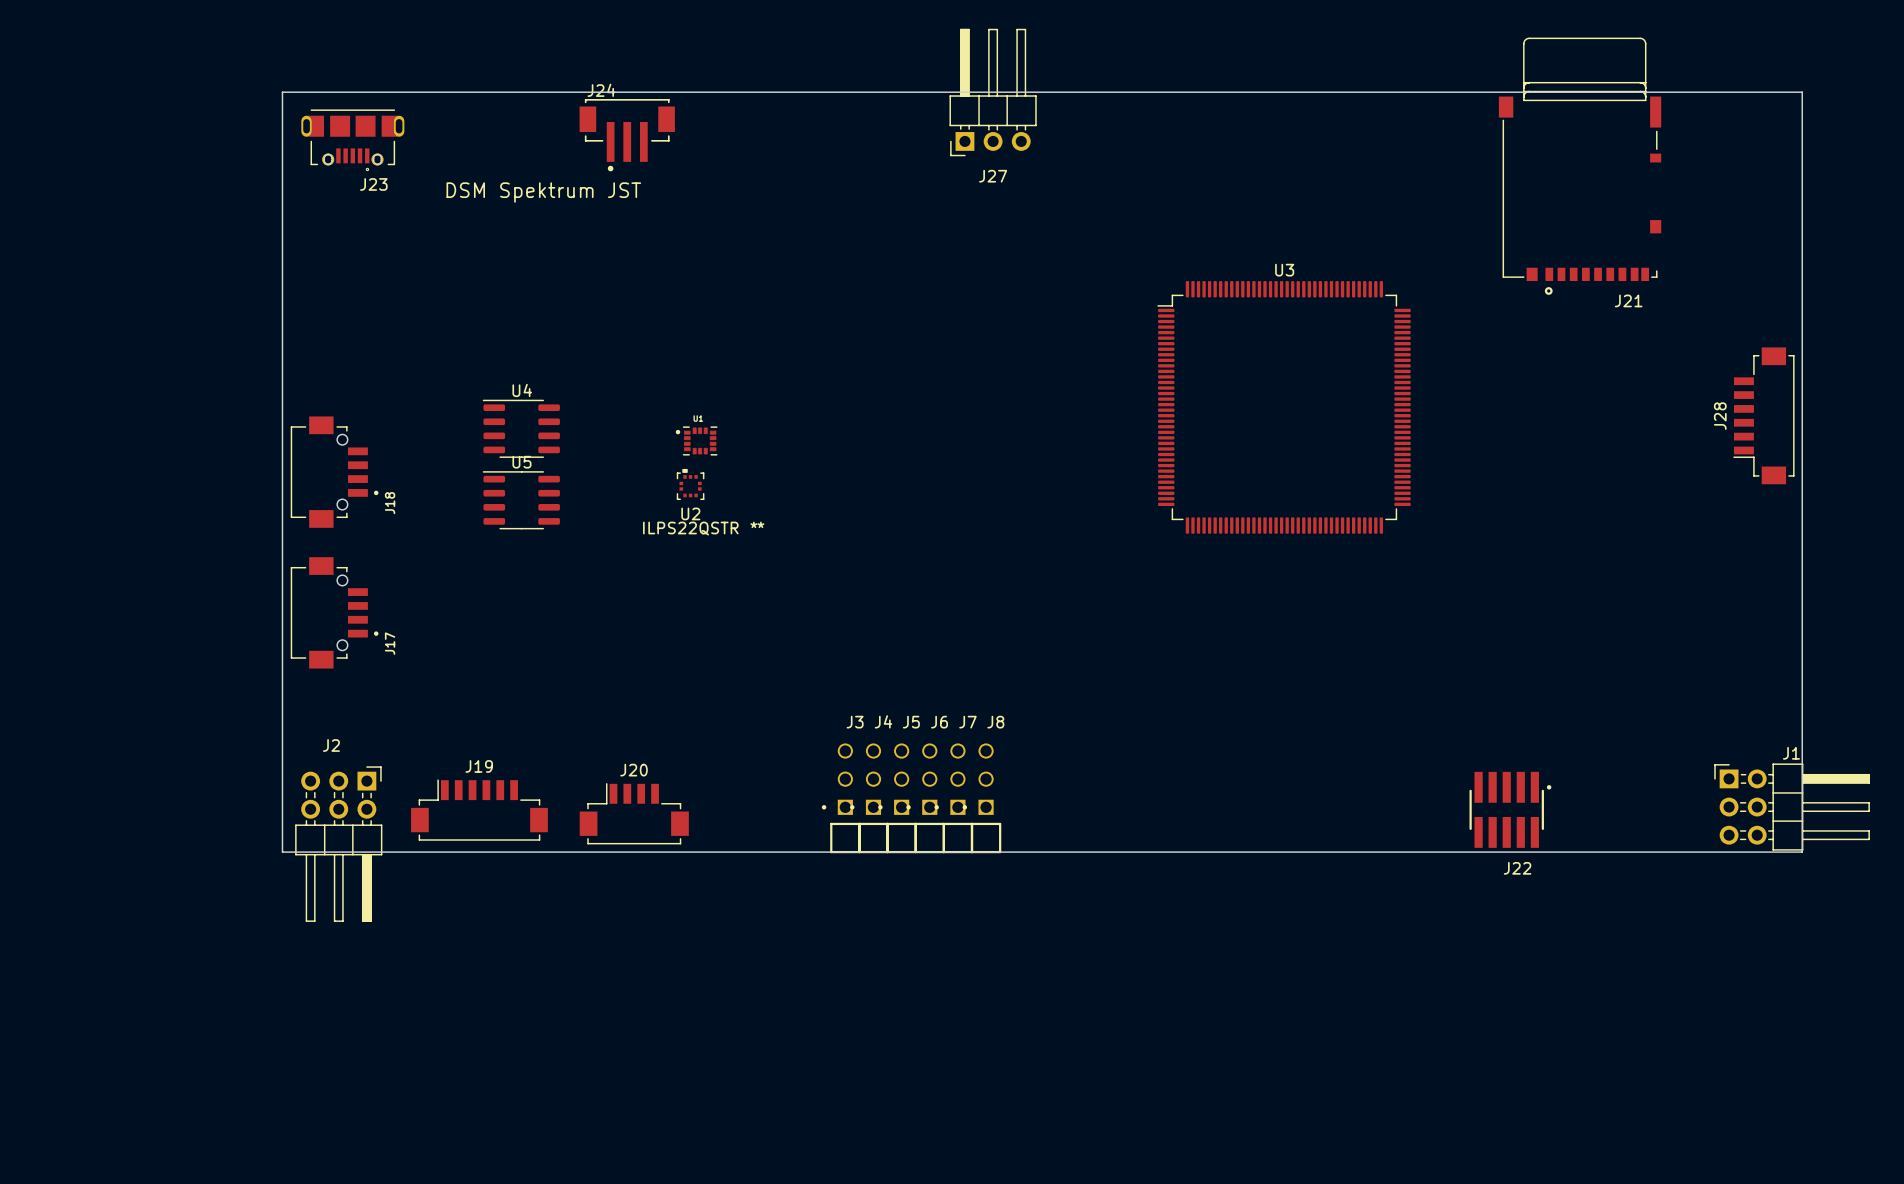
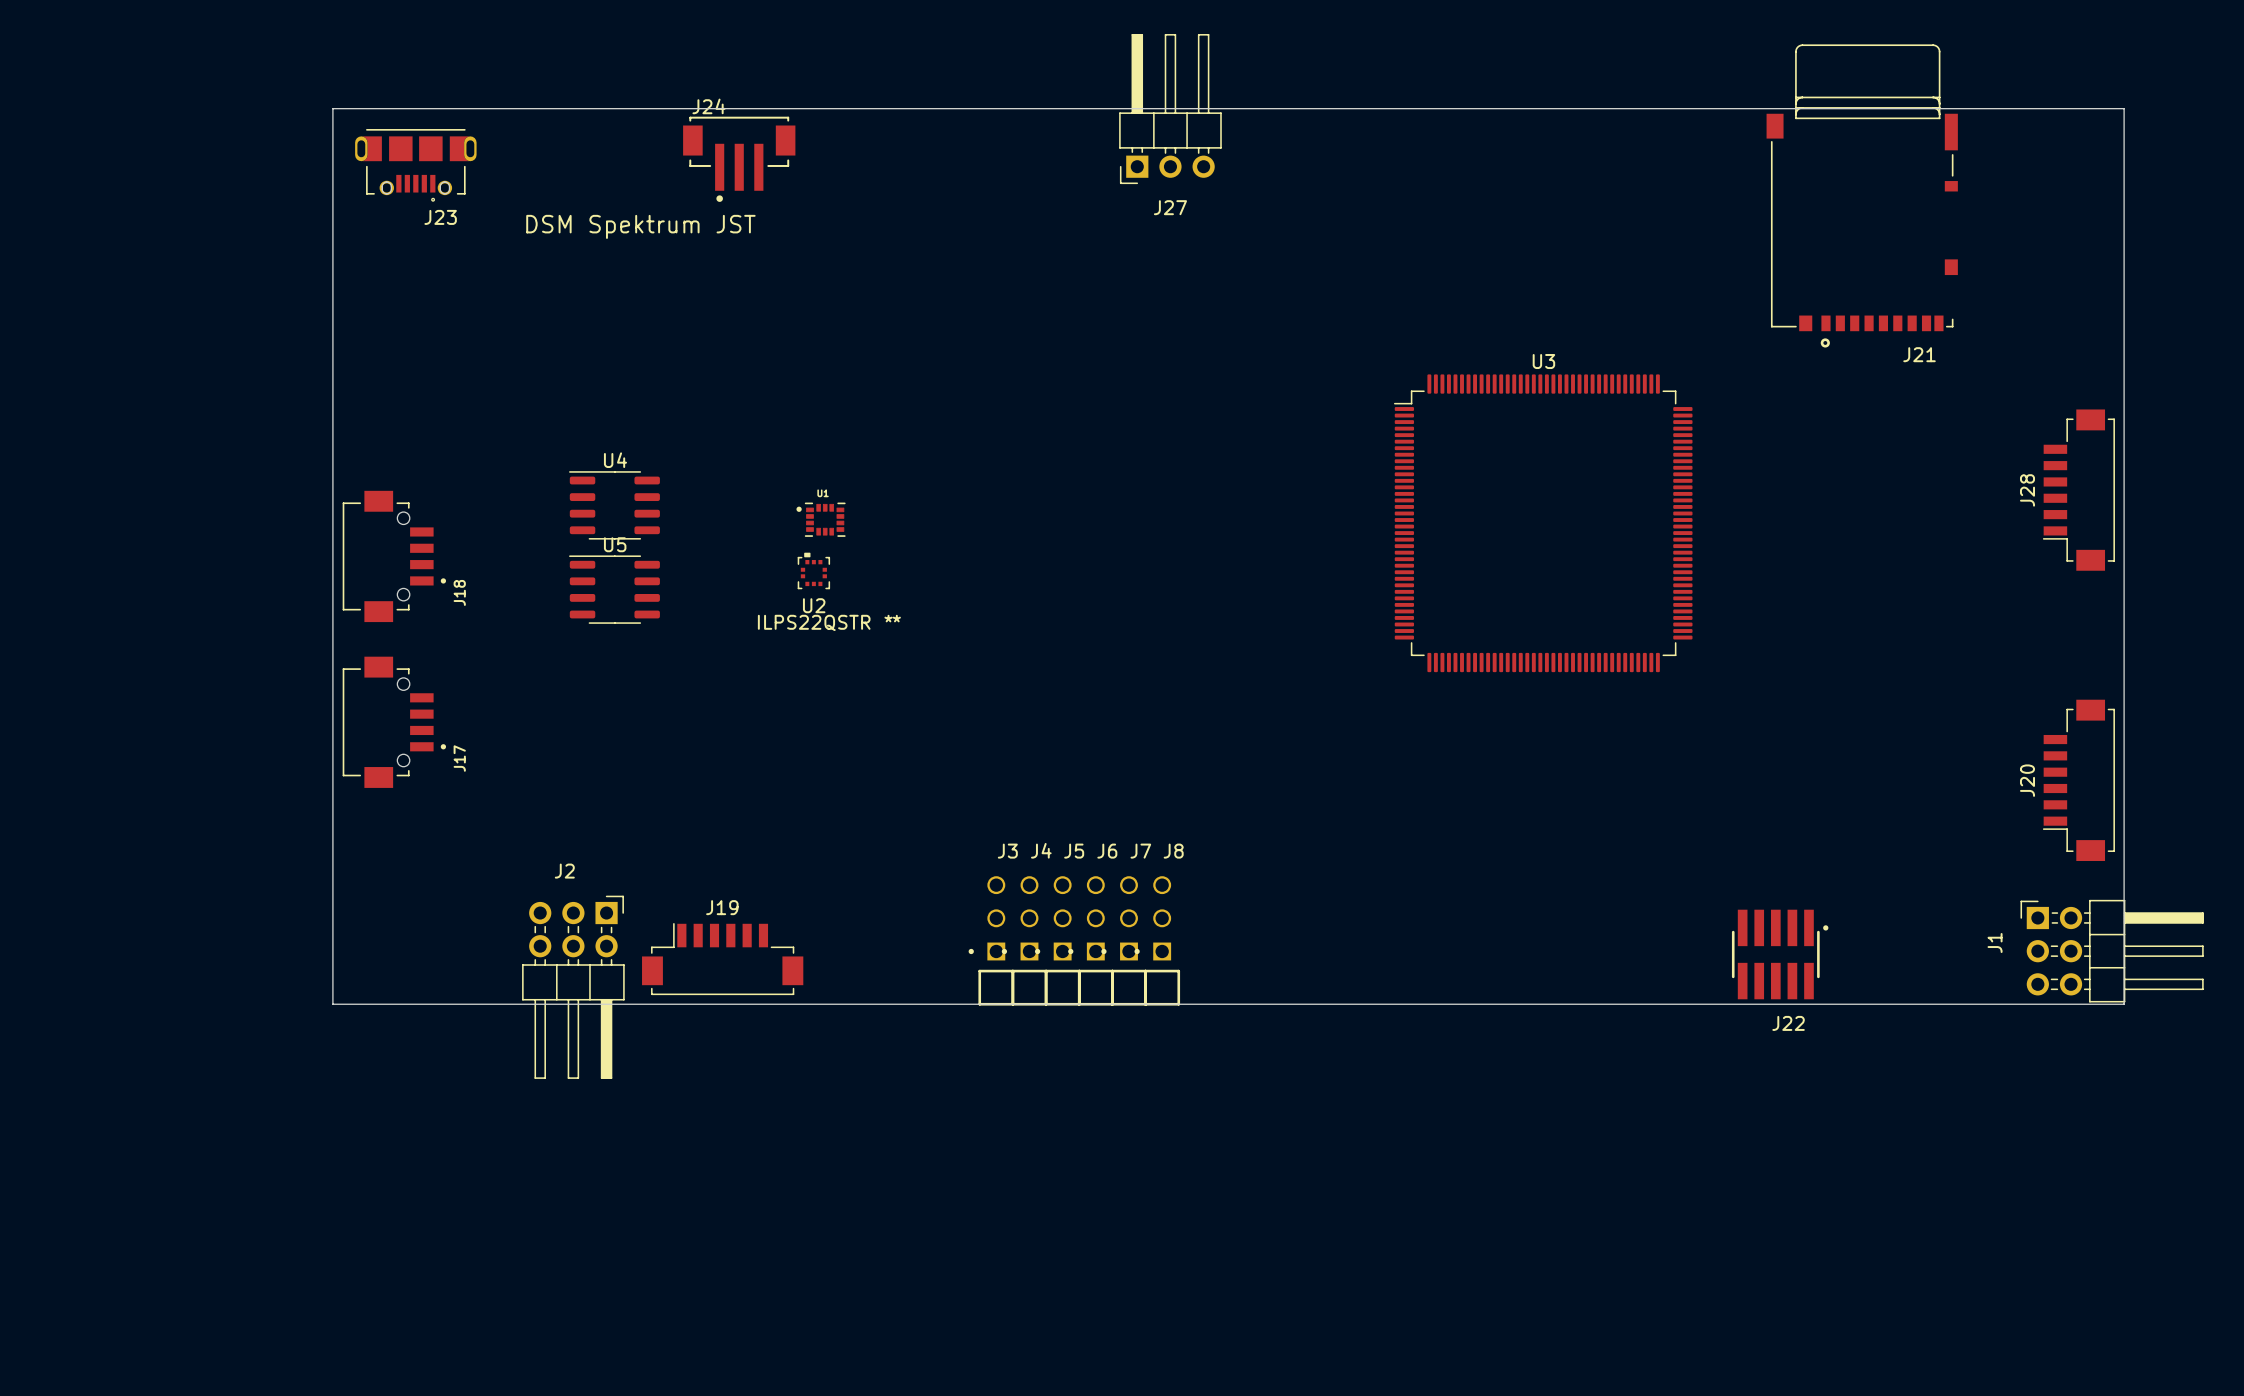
U3 position: (1284, 407) -> (1543, 523)
J1 name rotation: 0° (1791, 753) -> 90° counterclockwise (1995, 942)
J1 name position: J1 (1791, 753) -> J1 (1995, 942)
J20 name position: J20 (634, 770) -> J20 (2027, 780)
J20 footprint: [579, 783, 689, 845] -> [2042, 699, 2115, 861]
J19 position: (479, 810) -> (722, 959)
J2 position: (338, 844) -> (573, 987)

